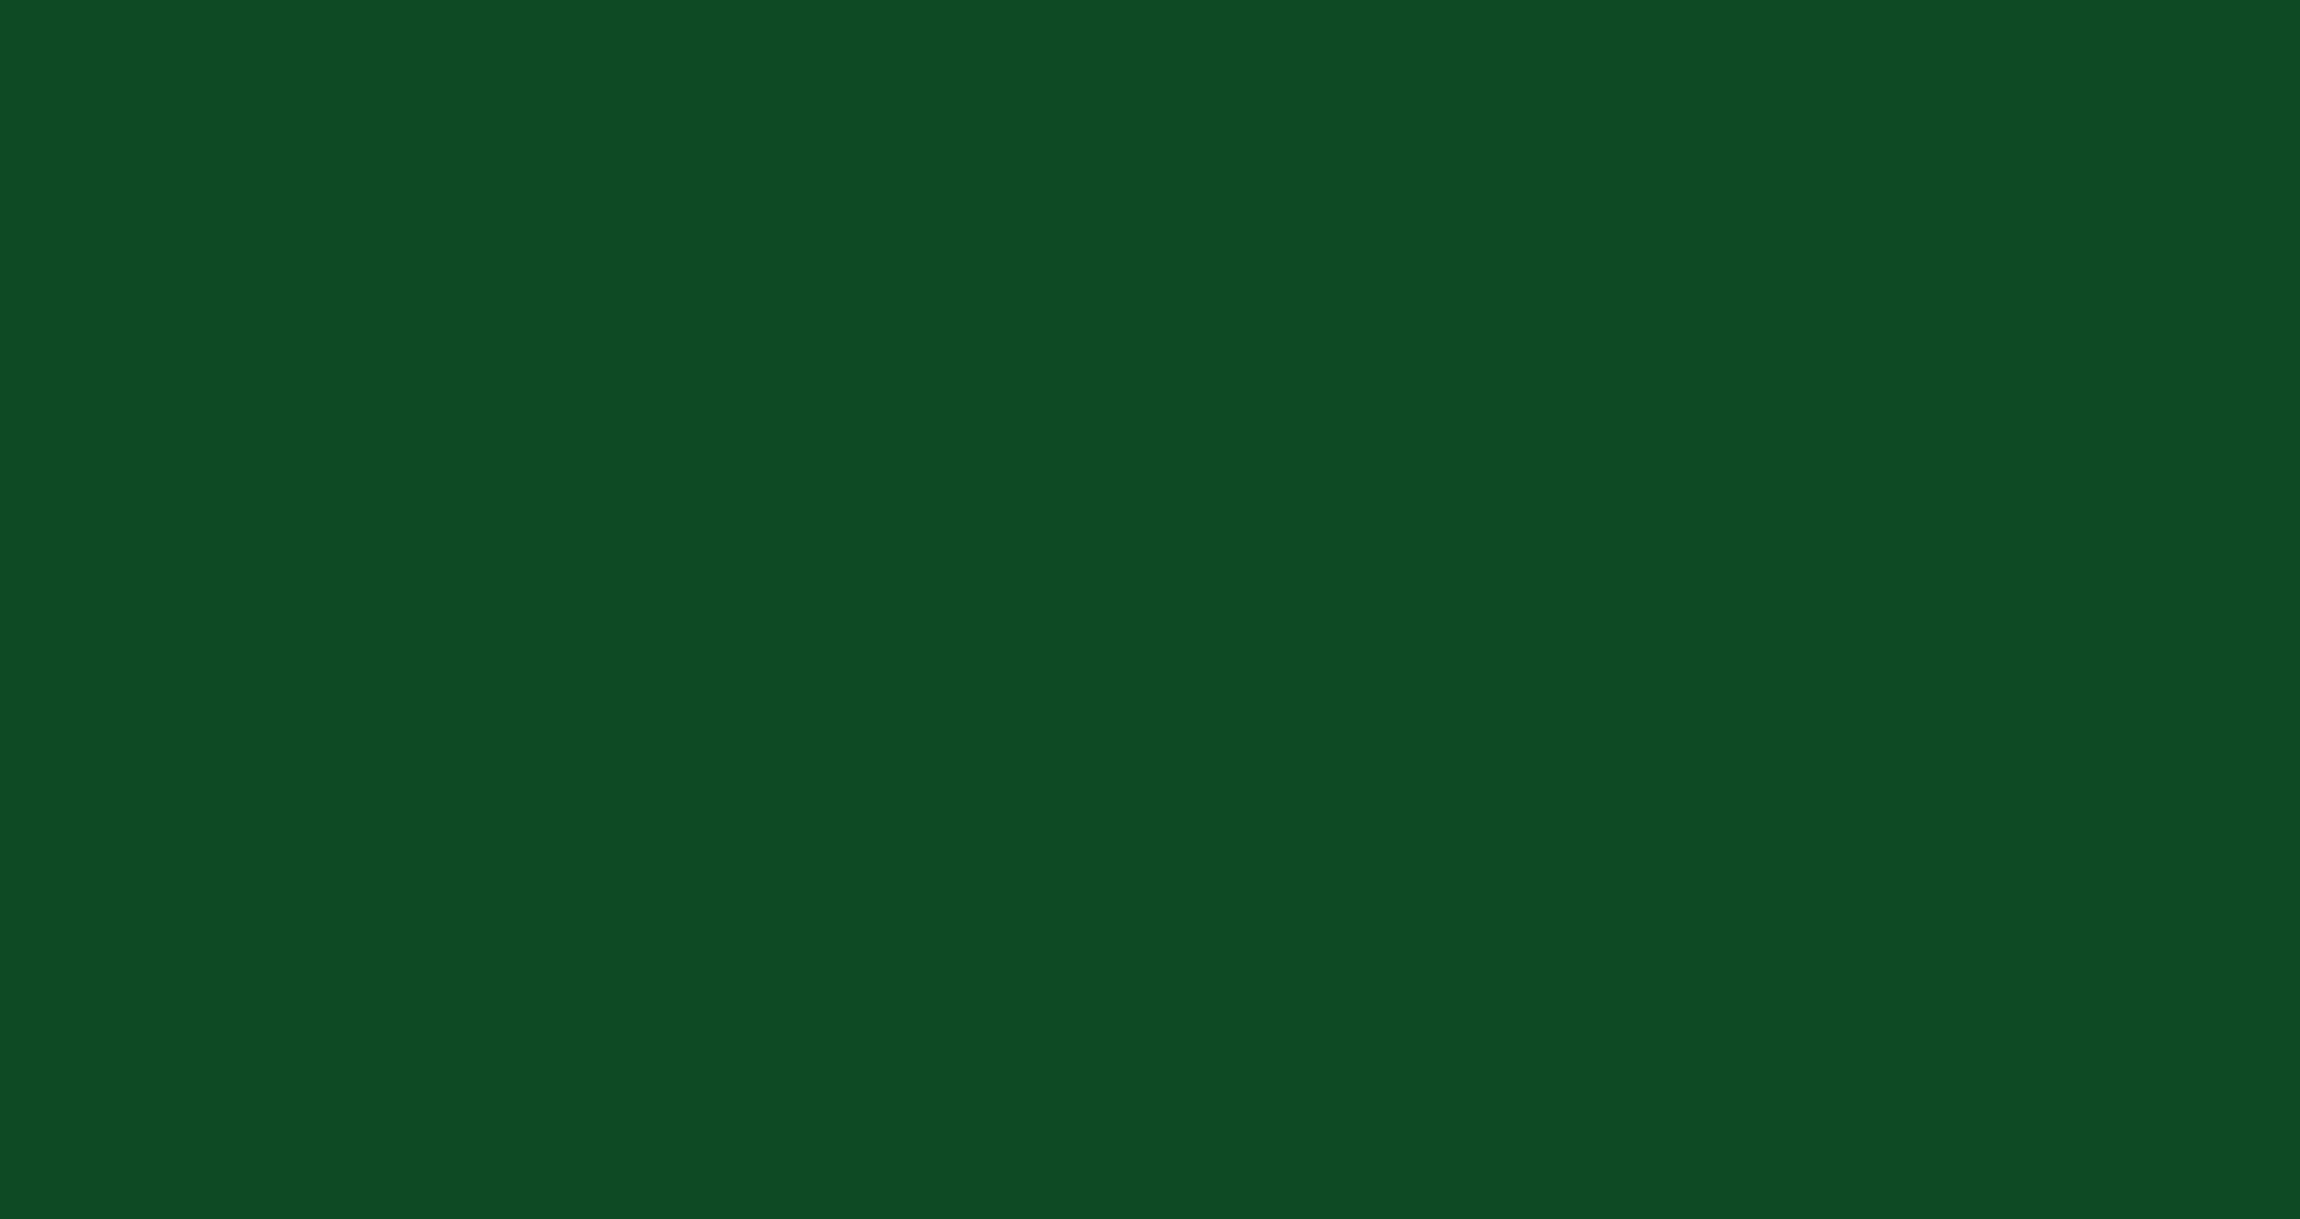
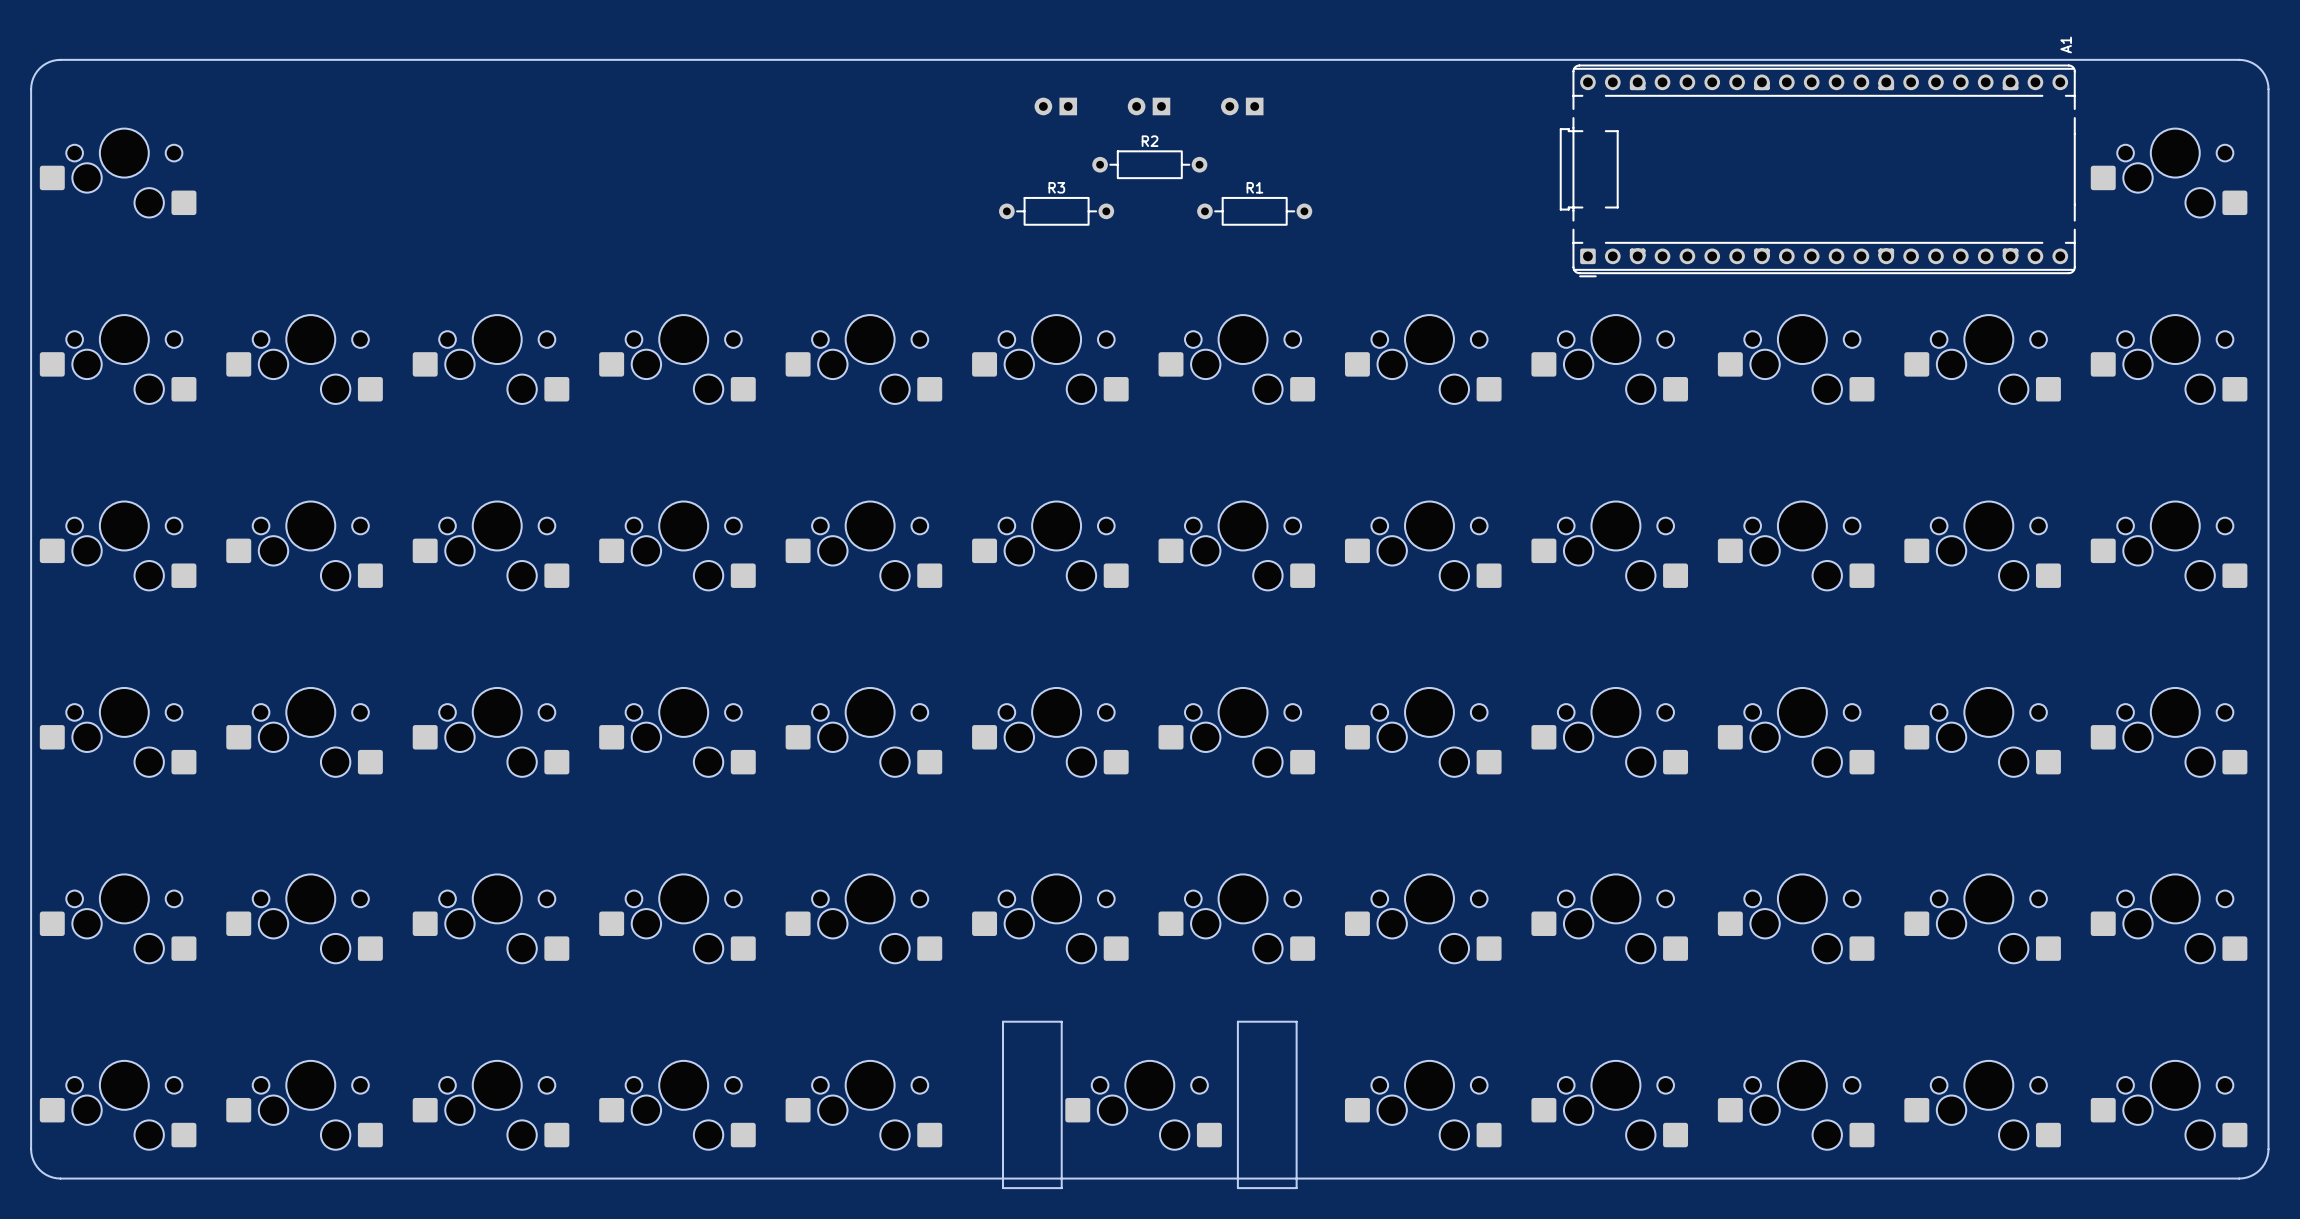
board edge: none -> (2239, 59) (60, 59) (45, 63) (35, 74) (31, 89) (31, 1149) (35, 1163) (45, 1174) (60, 1178) (2239, 1178) (2253, 1174) (2264, 1163) (2268, 1149) (2268, 89) (2266, 77) (2259, 68) (2250, 62) (2239, 59)
part: none -> (1055, 106)
part: none -> (1149, 106)
part: none -> (1242, 106)
R2: none -> (1149, 164)
A1: none -> (1817, 170)
part: none -> (118, 173)
part: none -> (2169, 173)
R3: none -> (1056, 211)
R1: none -> (1254, 211)
part: none -> (118, 359)
part: none -> (304, 359)
part: none -> (491, 359)
part: none -> (677, 359)
part: none -> (863, 359)
part: none -> (1050, 359)
part: none -> (1236, 359)
part: none -> (1423, 359)
part: none -> (1609, 359)
part: none -> (1796, 359)
part: none -> (1982, 359)
part: none -> (2169, 359)
part: none -> (118, 545)
part: none -> (304, 545)
part: none -> (491, 545)
part: none -> (677, 545)
part: none -> (863, 545)
part: none -> (1050, 545)
part: none -> (1236, 545)
part: none -> (1423, 545)
part: none -> (1609, 545)
part: none -> (1796, 545)
part: none -> (1982, 545)
part: none -> (2169, 545)
part: none -> (118, 732)
part: none -> (304, 732)
part: none -> (491, 732)
part: none -> (677, 732)
part: none -> (863, 732)
part: none -> (1050, 732)
part: none -> (1236, 732)
part: none -> (1423, 732)
part: none -> (1609, 732)
part: none -> (1796, 732)
part: none -> (1982, 732)
part: none -> (2169, 732)
part: none -> (118, 918)
part: none -> (304, 918)
part: none -> (491, 918)
part: none -> (677, 918)
part: none -> (863, 918)
part: none -> (1050, 918)
part: none -> (1236, 918)
part: none -> (1423, 918)
part: none -> (1609, 918)
part: none -> (1796, 918)
part: none -> (1982, 918)
part: none -> (2169, 918)
part: none -> (1149, 1104)
part: none -> (118, 1105)
part: none -> (304, 1105)
part: none -> (491, 1105)
part: none -> (677, 1105)
part: none -> (863, 1105)
part: none -> (1423, 1105)
part: none -> (1609, 1105)
part: none -> (1796, 1105)
part: none -> (1982, 1105)
part: none -> (2169, 1105)

